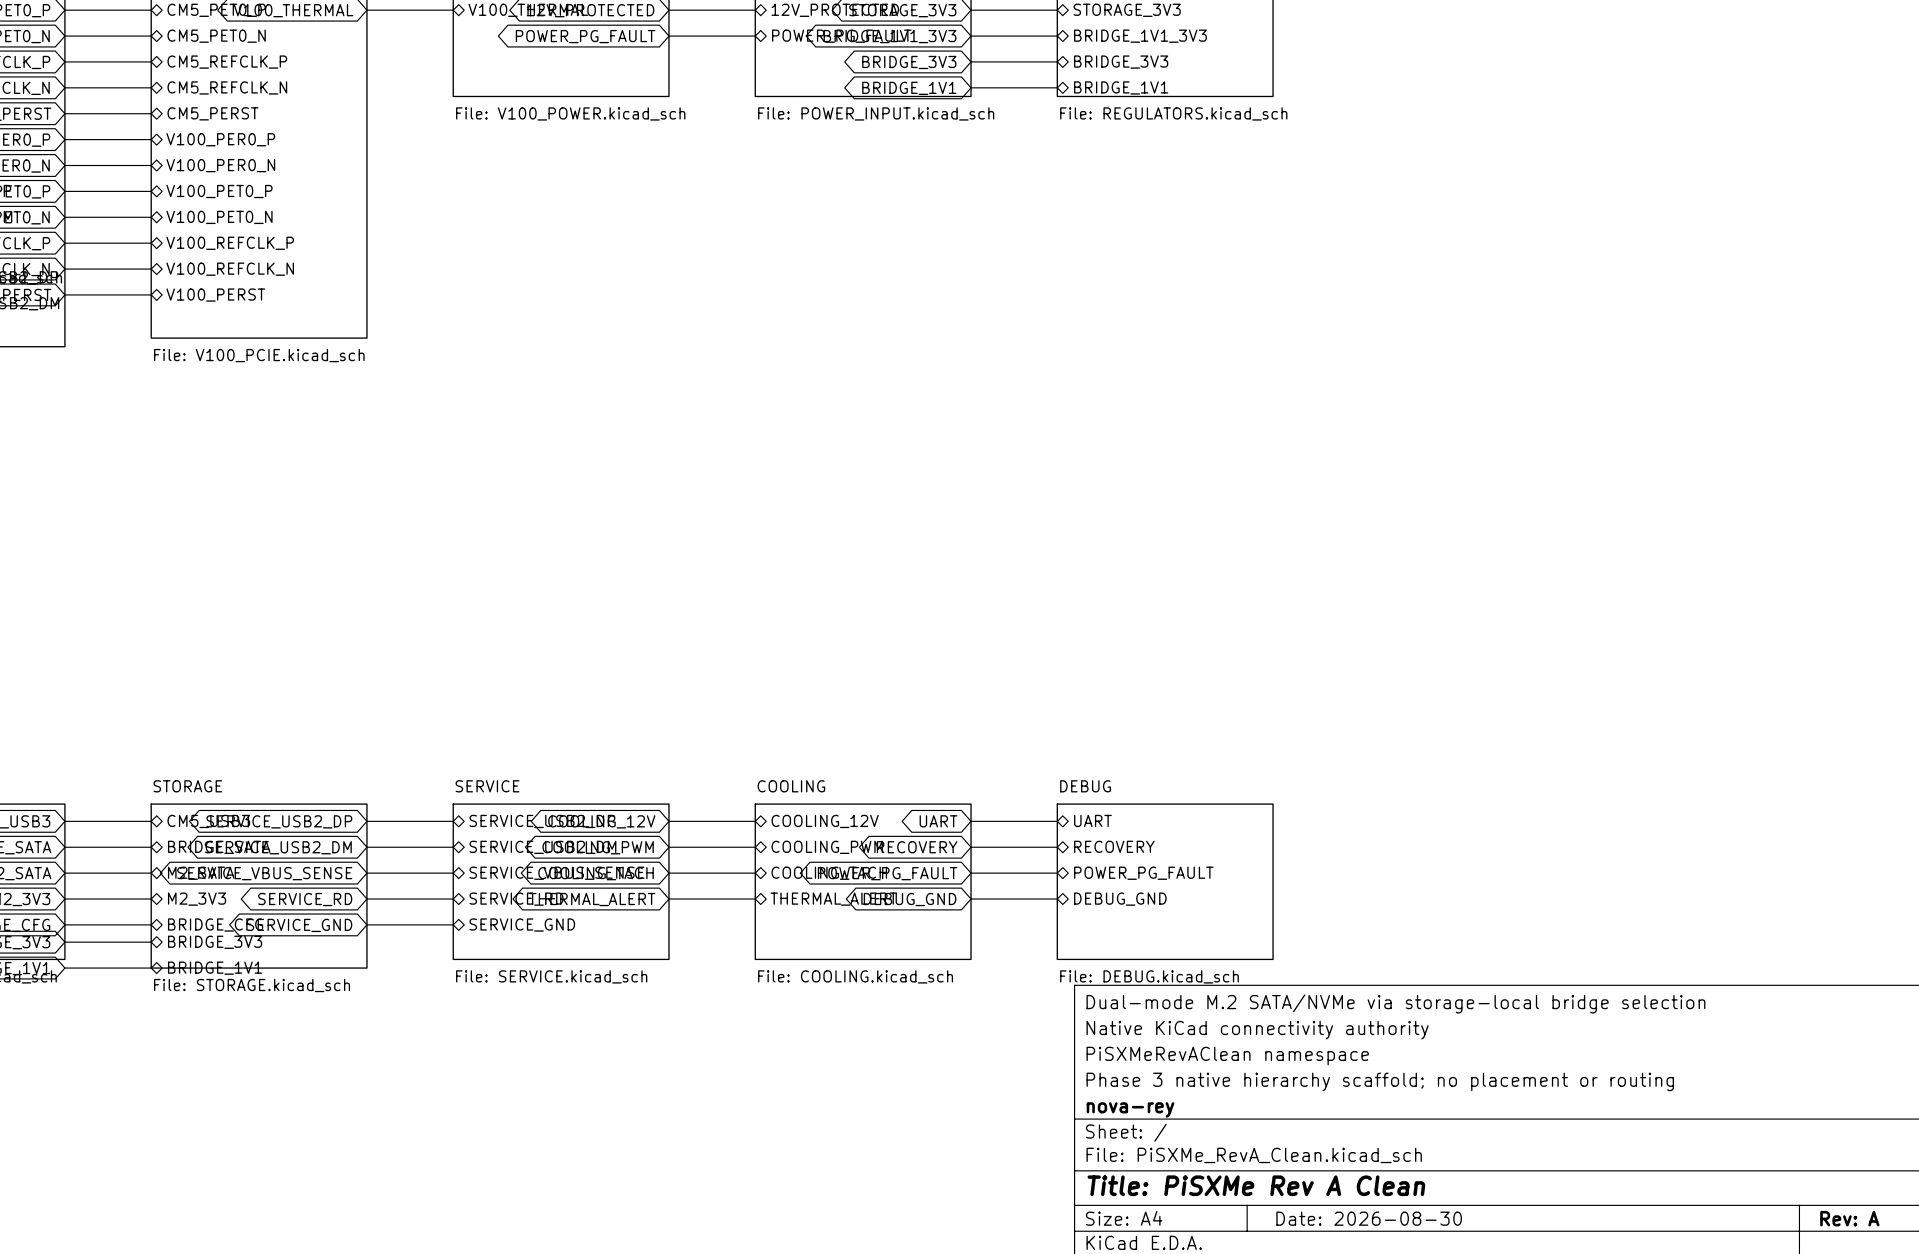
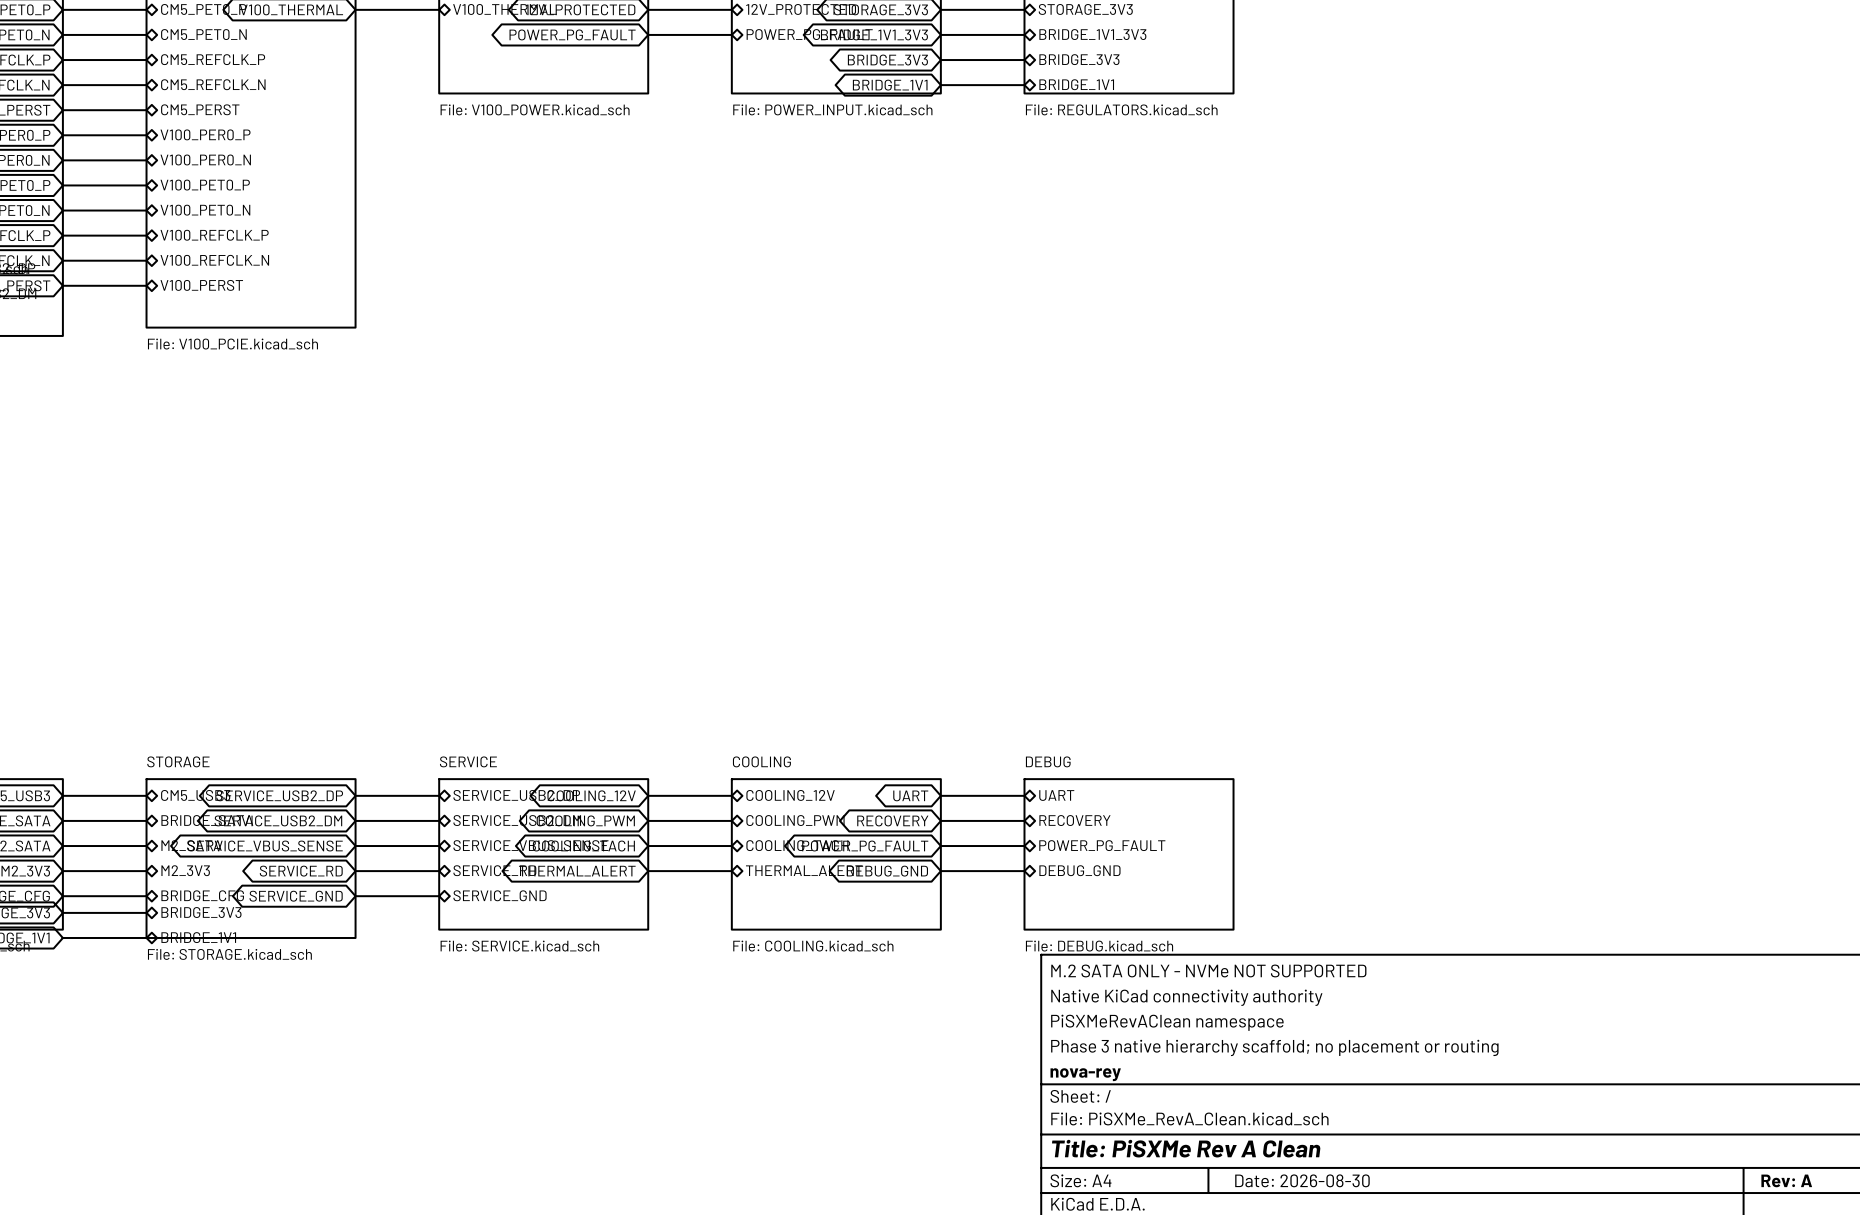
title block: Dual-mode M.2 SATA/NVMe via storage-local bridge selection (1395, 1003) -> M.2 SATA ONLY - NVMe NOT SUPPORTED (1208, 970)

